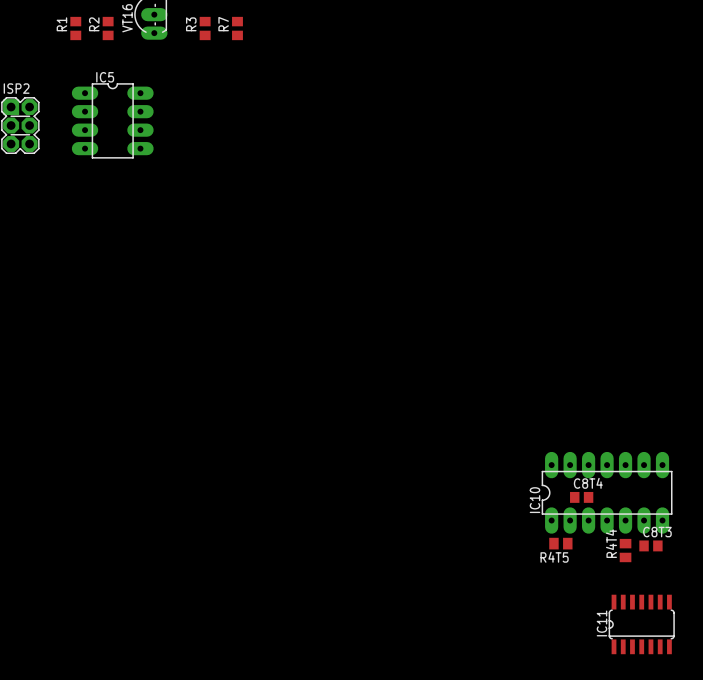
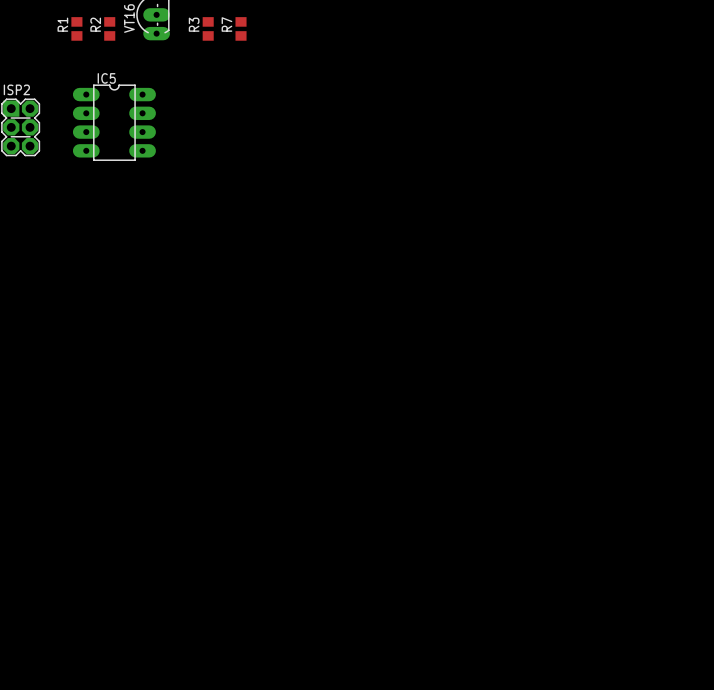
IC10: (607, 492) -> none
C8T4: (581, 497) -> none
R4T5: (560, 543) -> none
C8T3: (650, 545) -> none
R4T4: (625, 550) -> none
IC11: (641, 624) -> none

